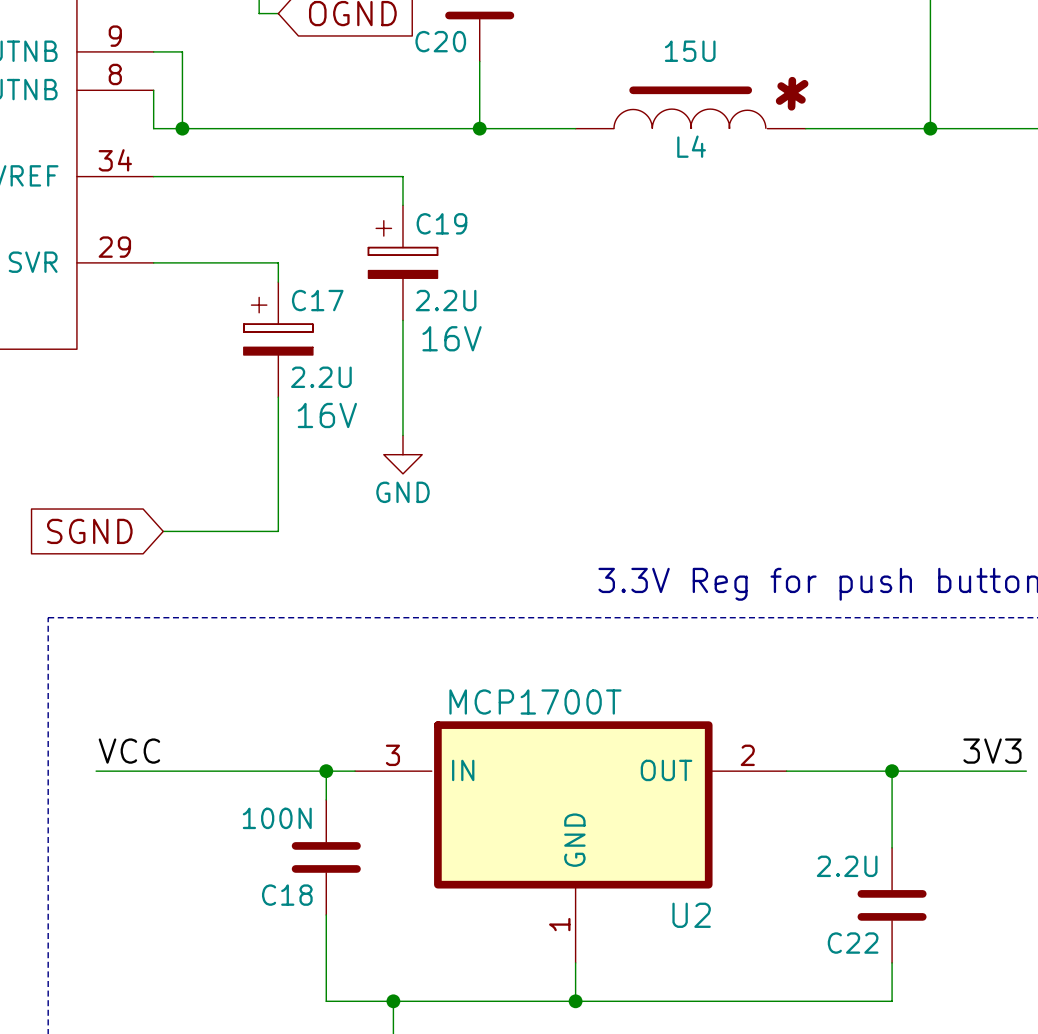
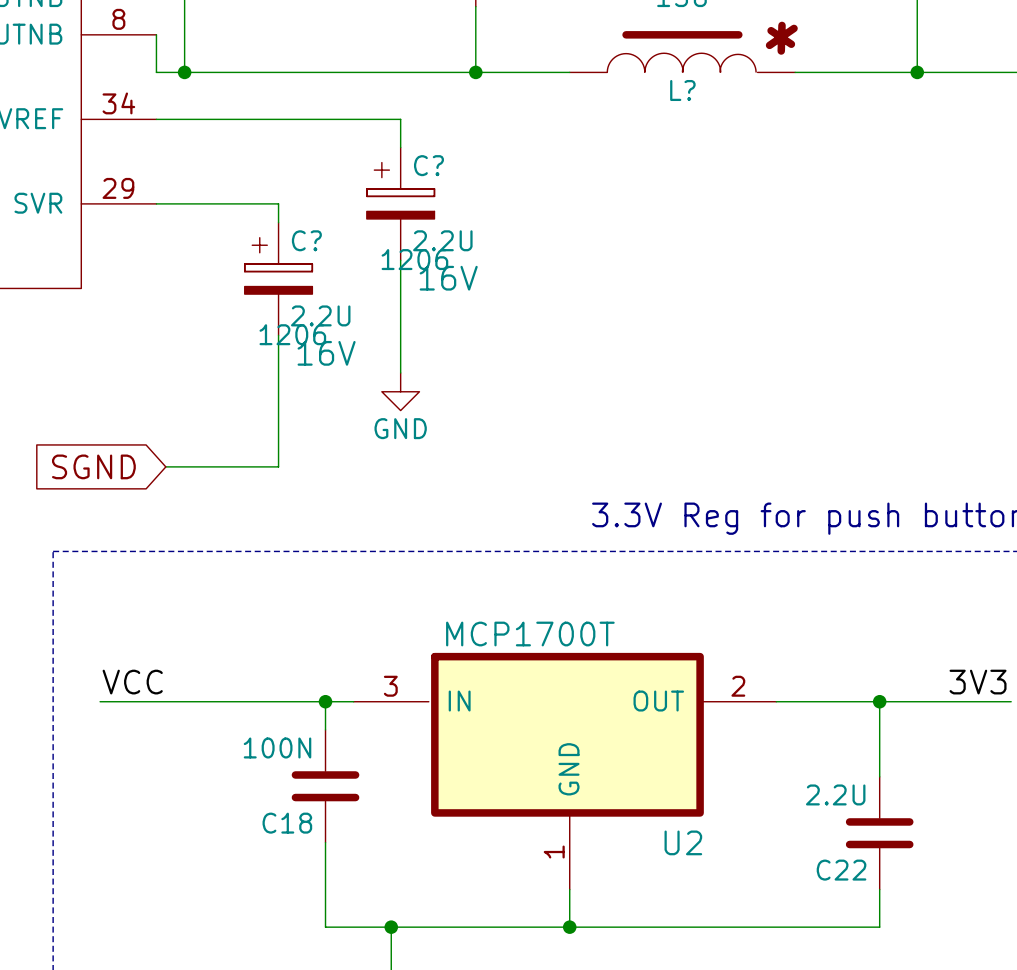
L4 name: L4 (691, 146) -> L? (682, 90)
C19 name: C19 (441, 223) -> C? (428, 165)
C17 name: C17 (317, 300) -> C? (306, 240)
C19 text: none -> 1206 (414, 259)
C17 text: none -> 1206 (292, 334)

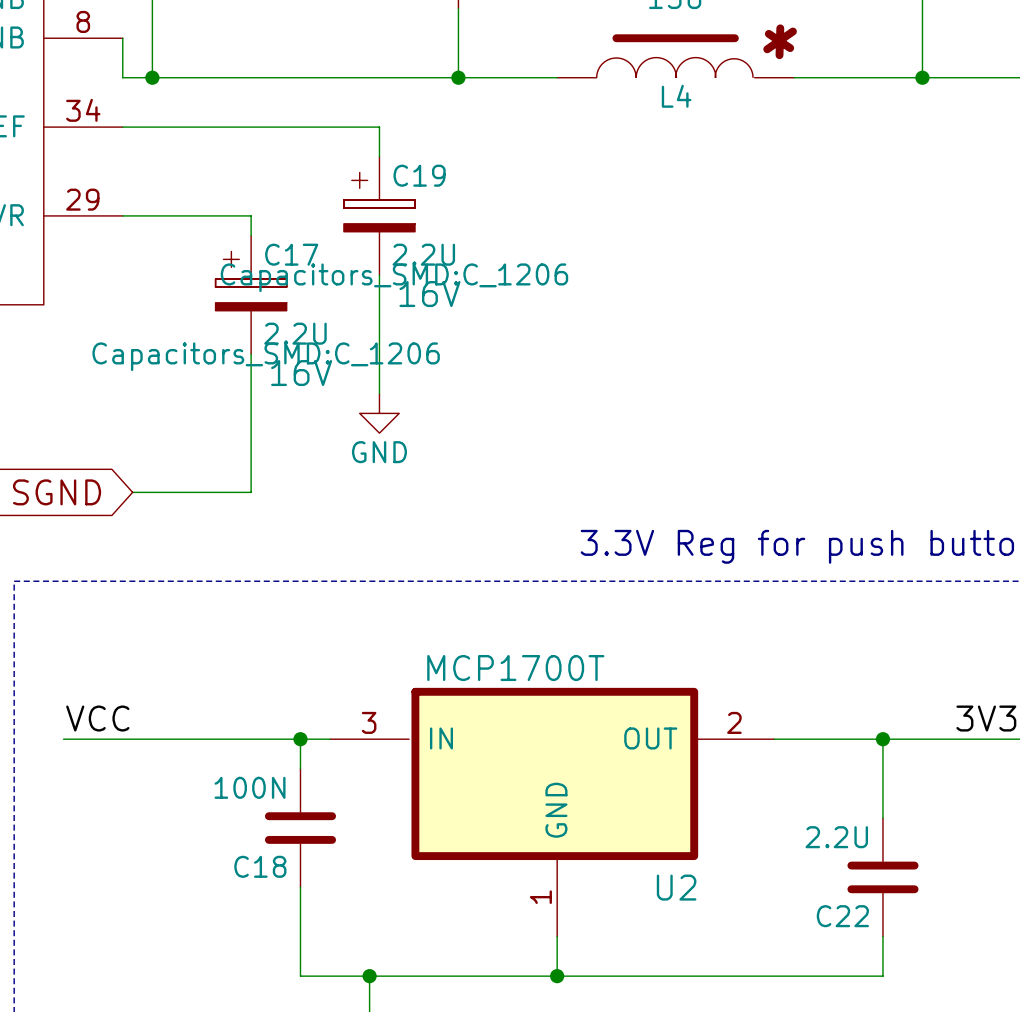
L? name: L? (682, 90) -> L4 (676, 96)
C? name: C? (428, 165) -> C19 (419, 175)
C? name: C? (306, 240) -> C17 (291, 254)
C? text: 1206 (414, 259) -> Capacitors_SMD:C_1206 (394, 277)
C? text: 1206 (292, 334) -> Capacitors_SMD:C_1206 (266, 356)

